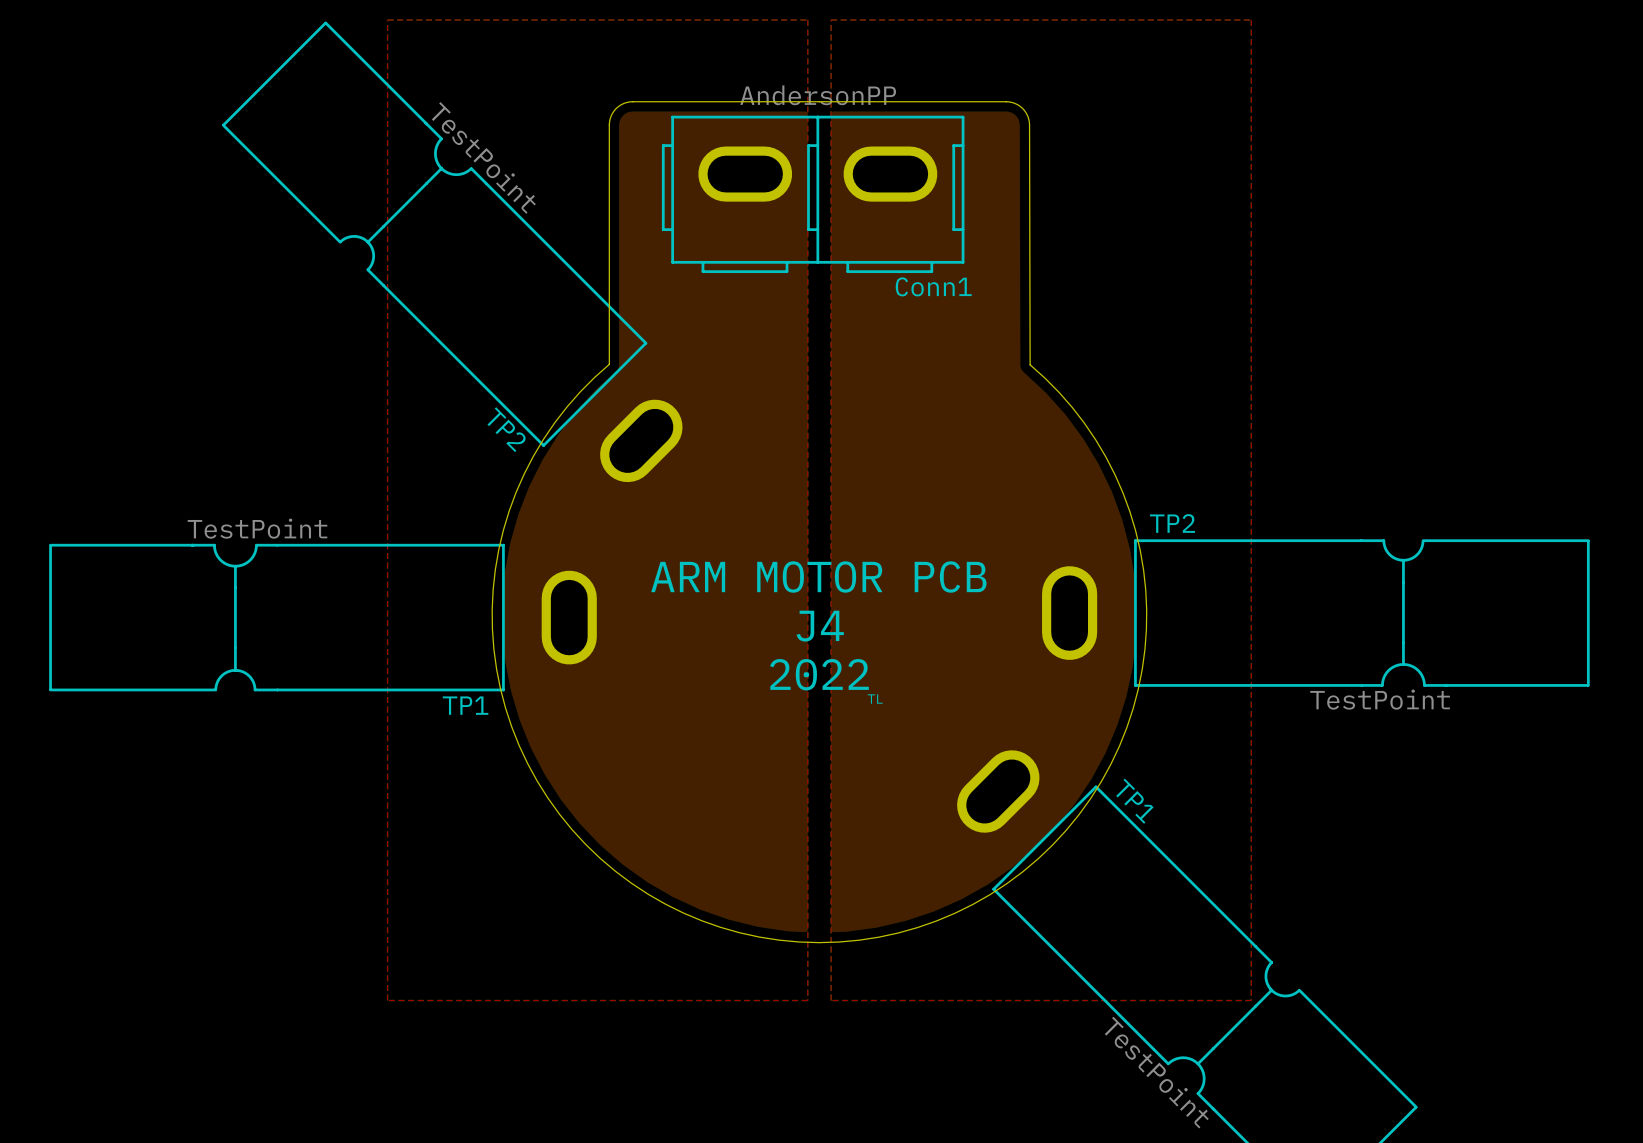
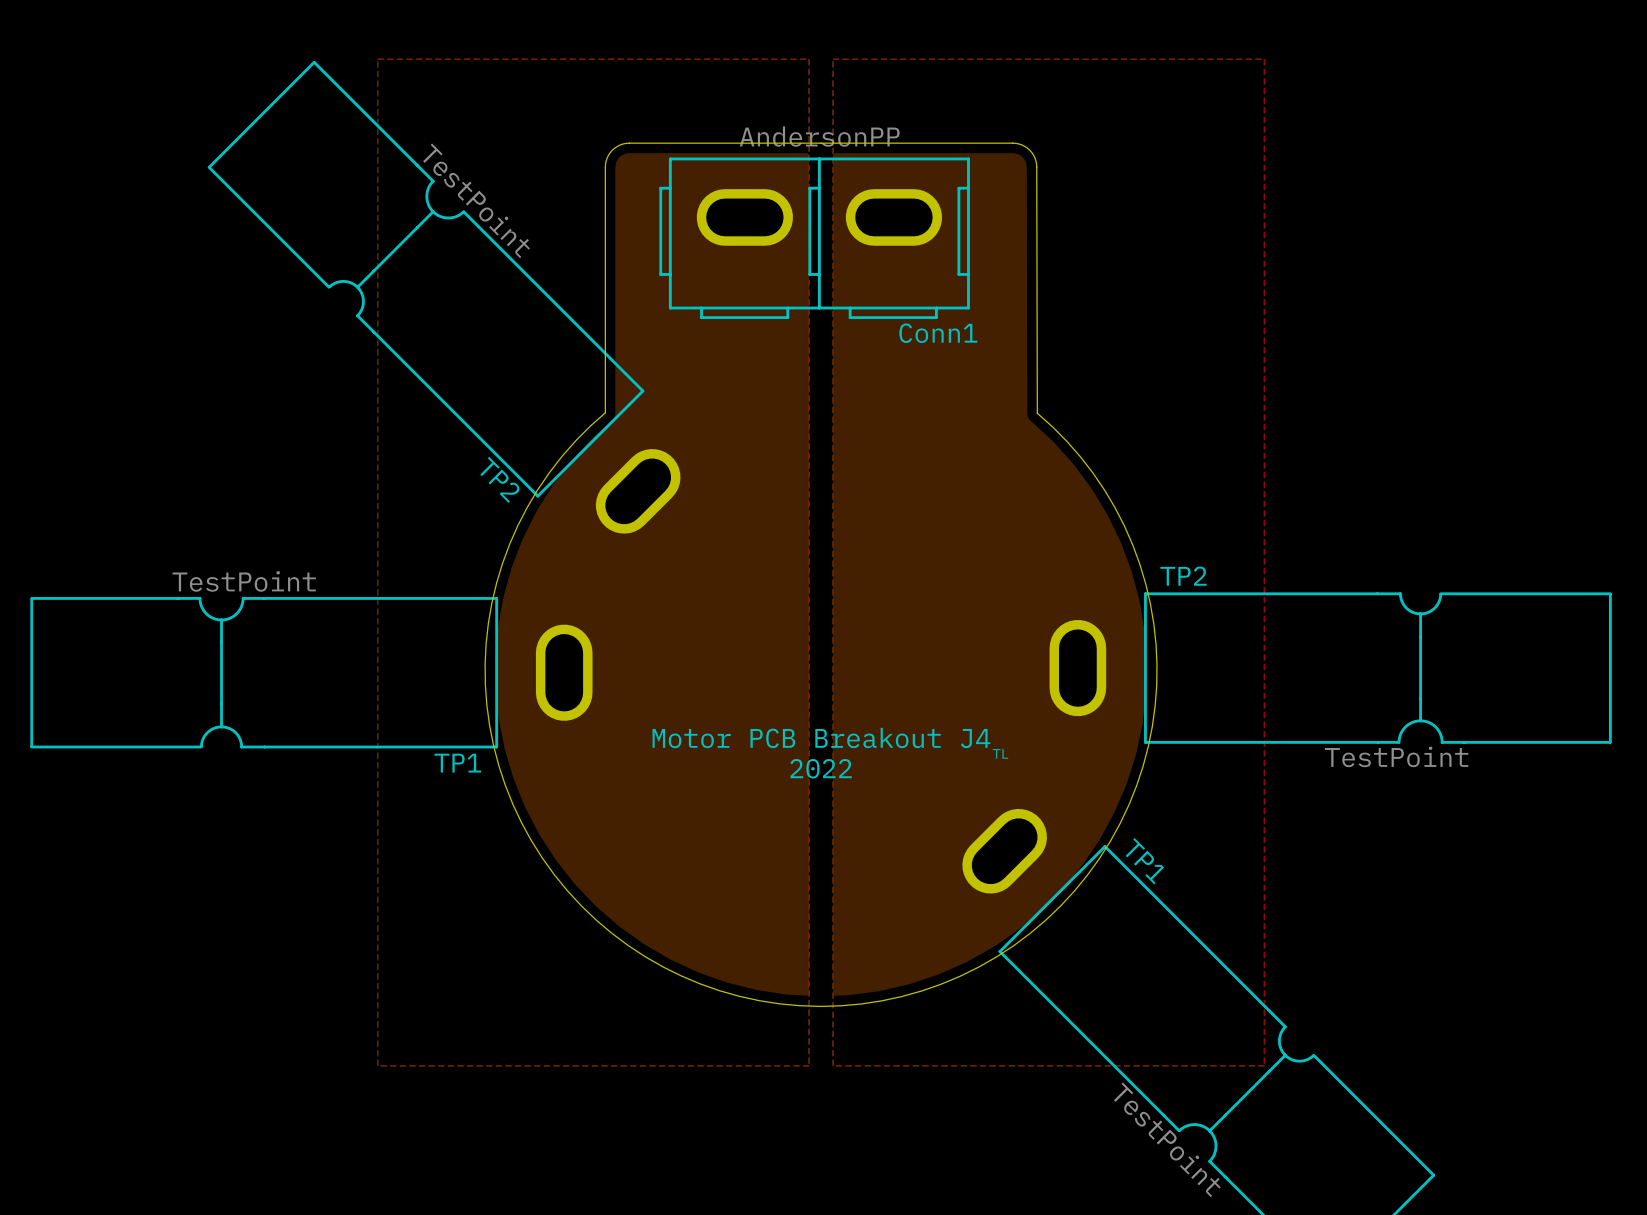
text: ARM MOTOR PCB (818, 577) -> none
text: J4 (820, 626) -> none
text: 2022 (819, 674) -> Motor PCB Breakout J4 (821, 737)
text position: TL (875, 699) -> TL (1000, 753)
text: none -> 2022 (821, 768)

